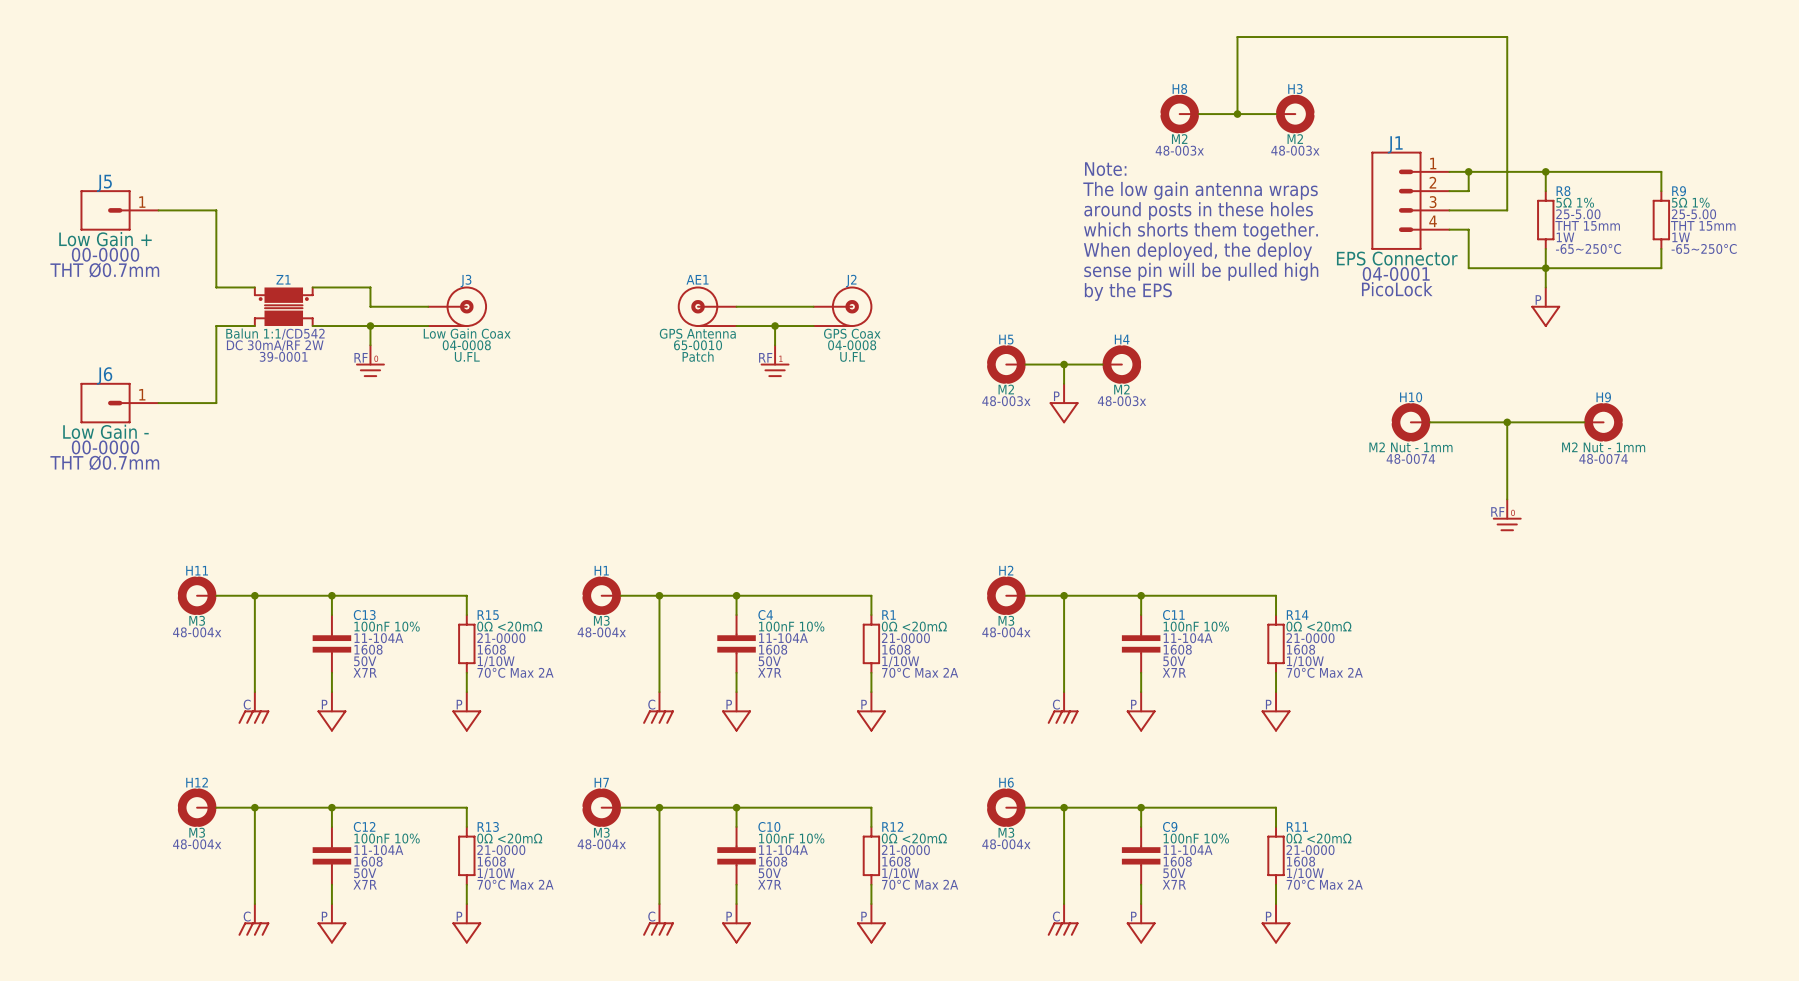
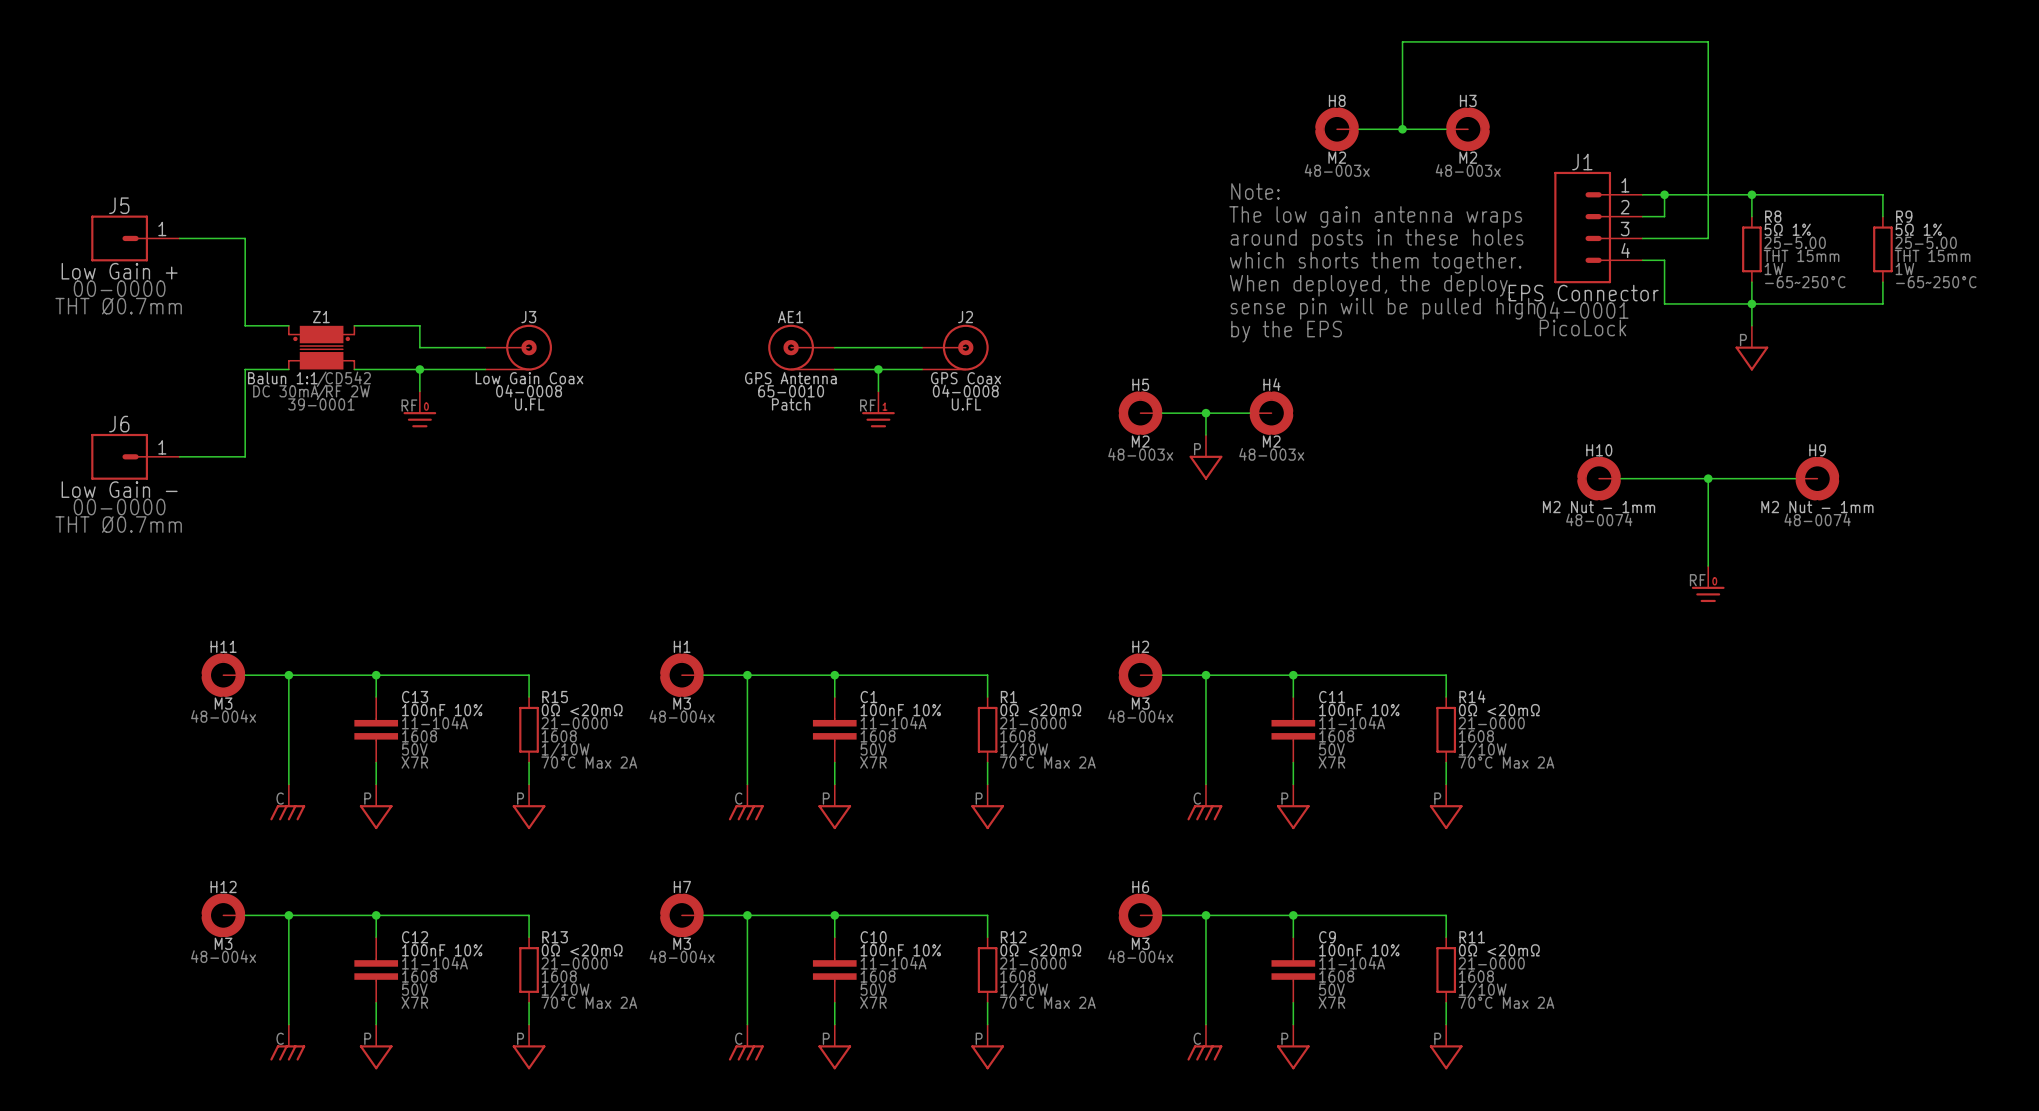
C4 name: C4 (765, 615) -> C1 (868, 697)

